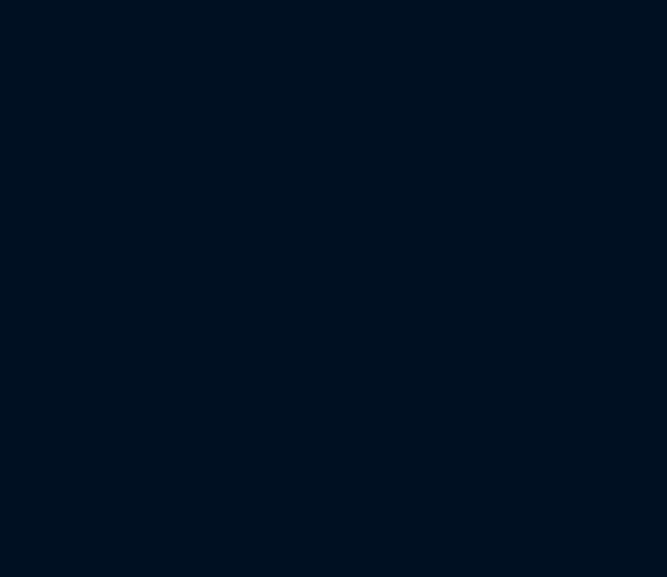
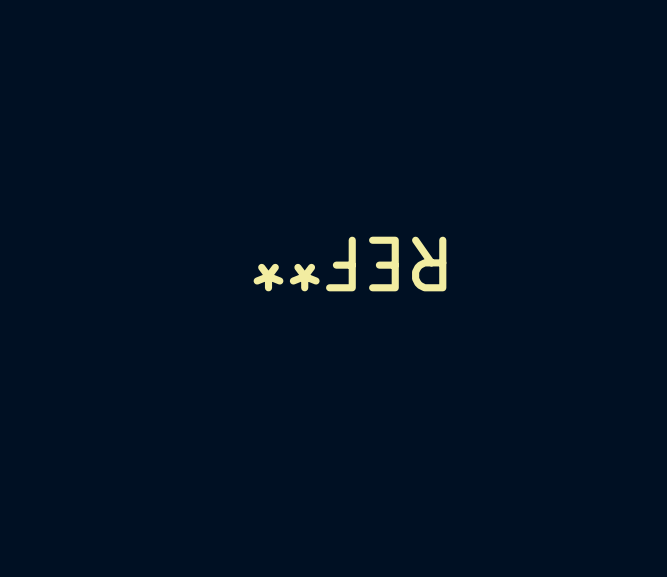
text: none -> REF** (349, 264)

